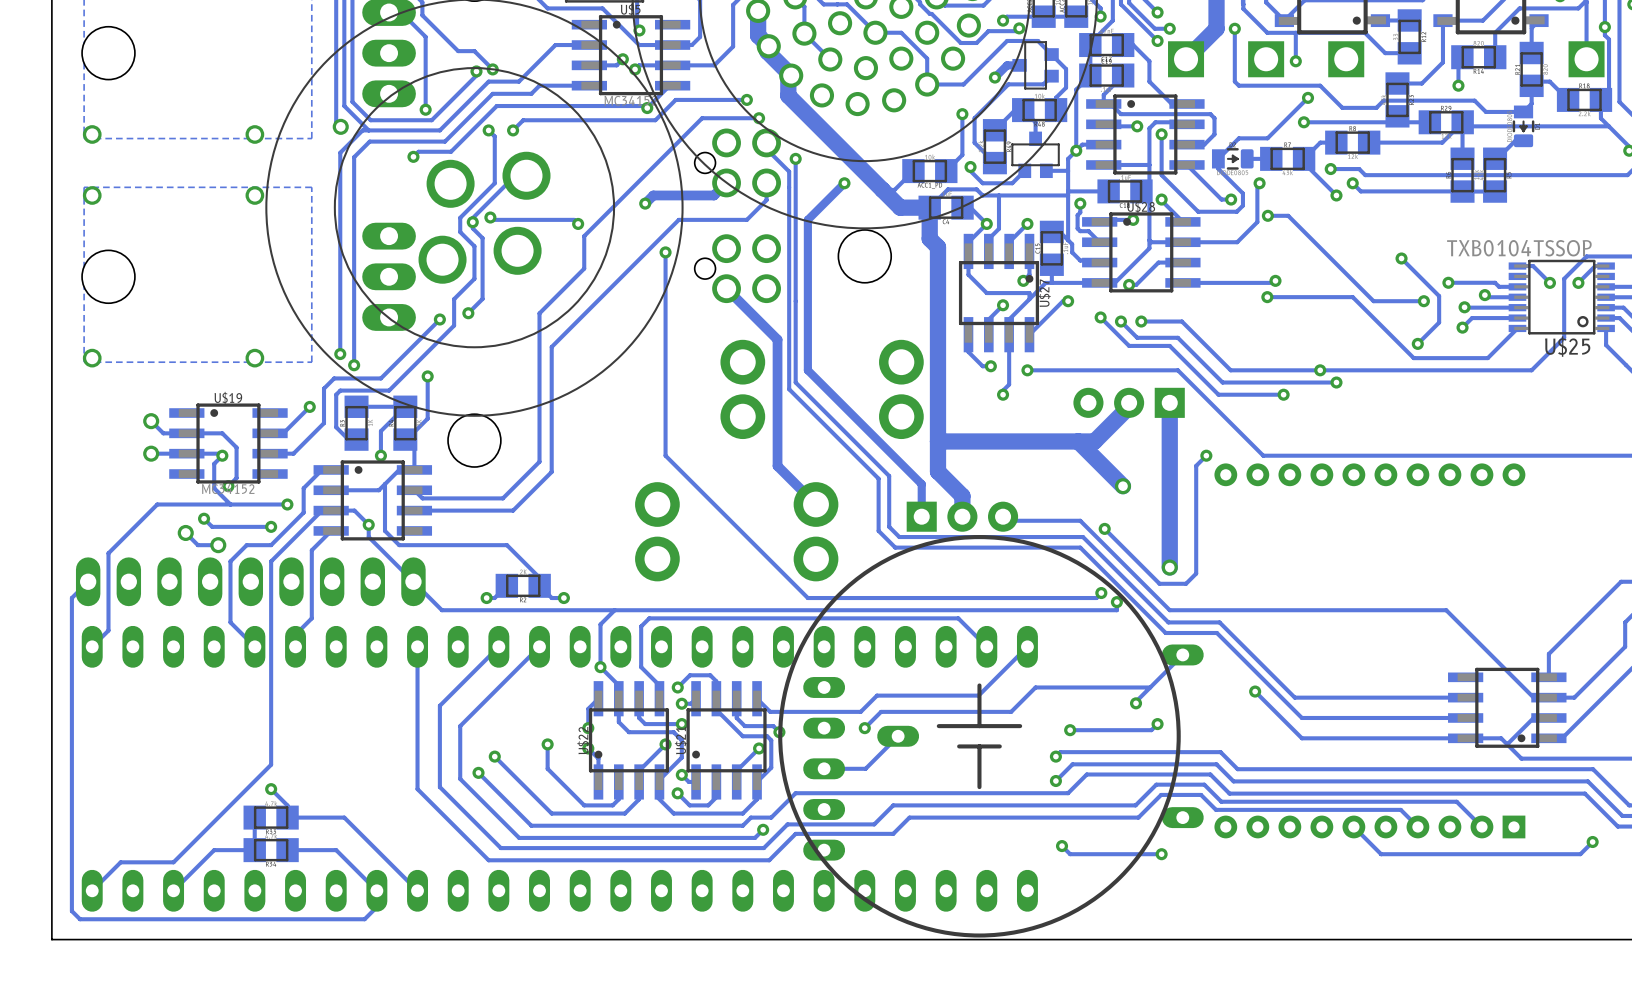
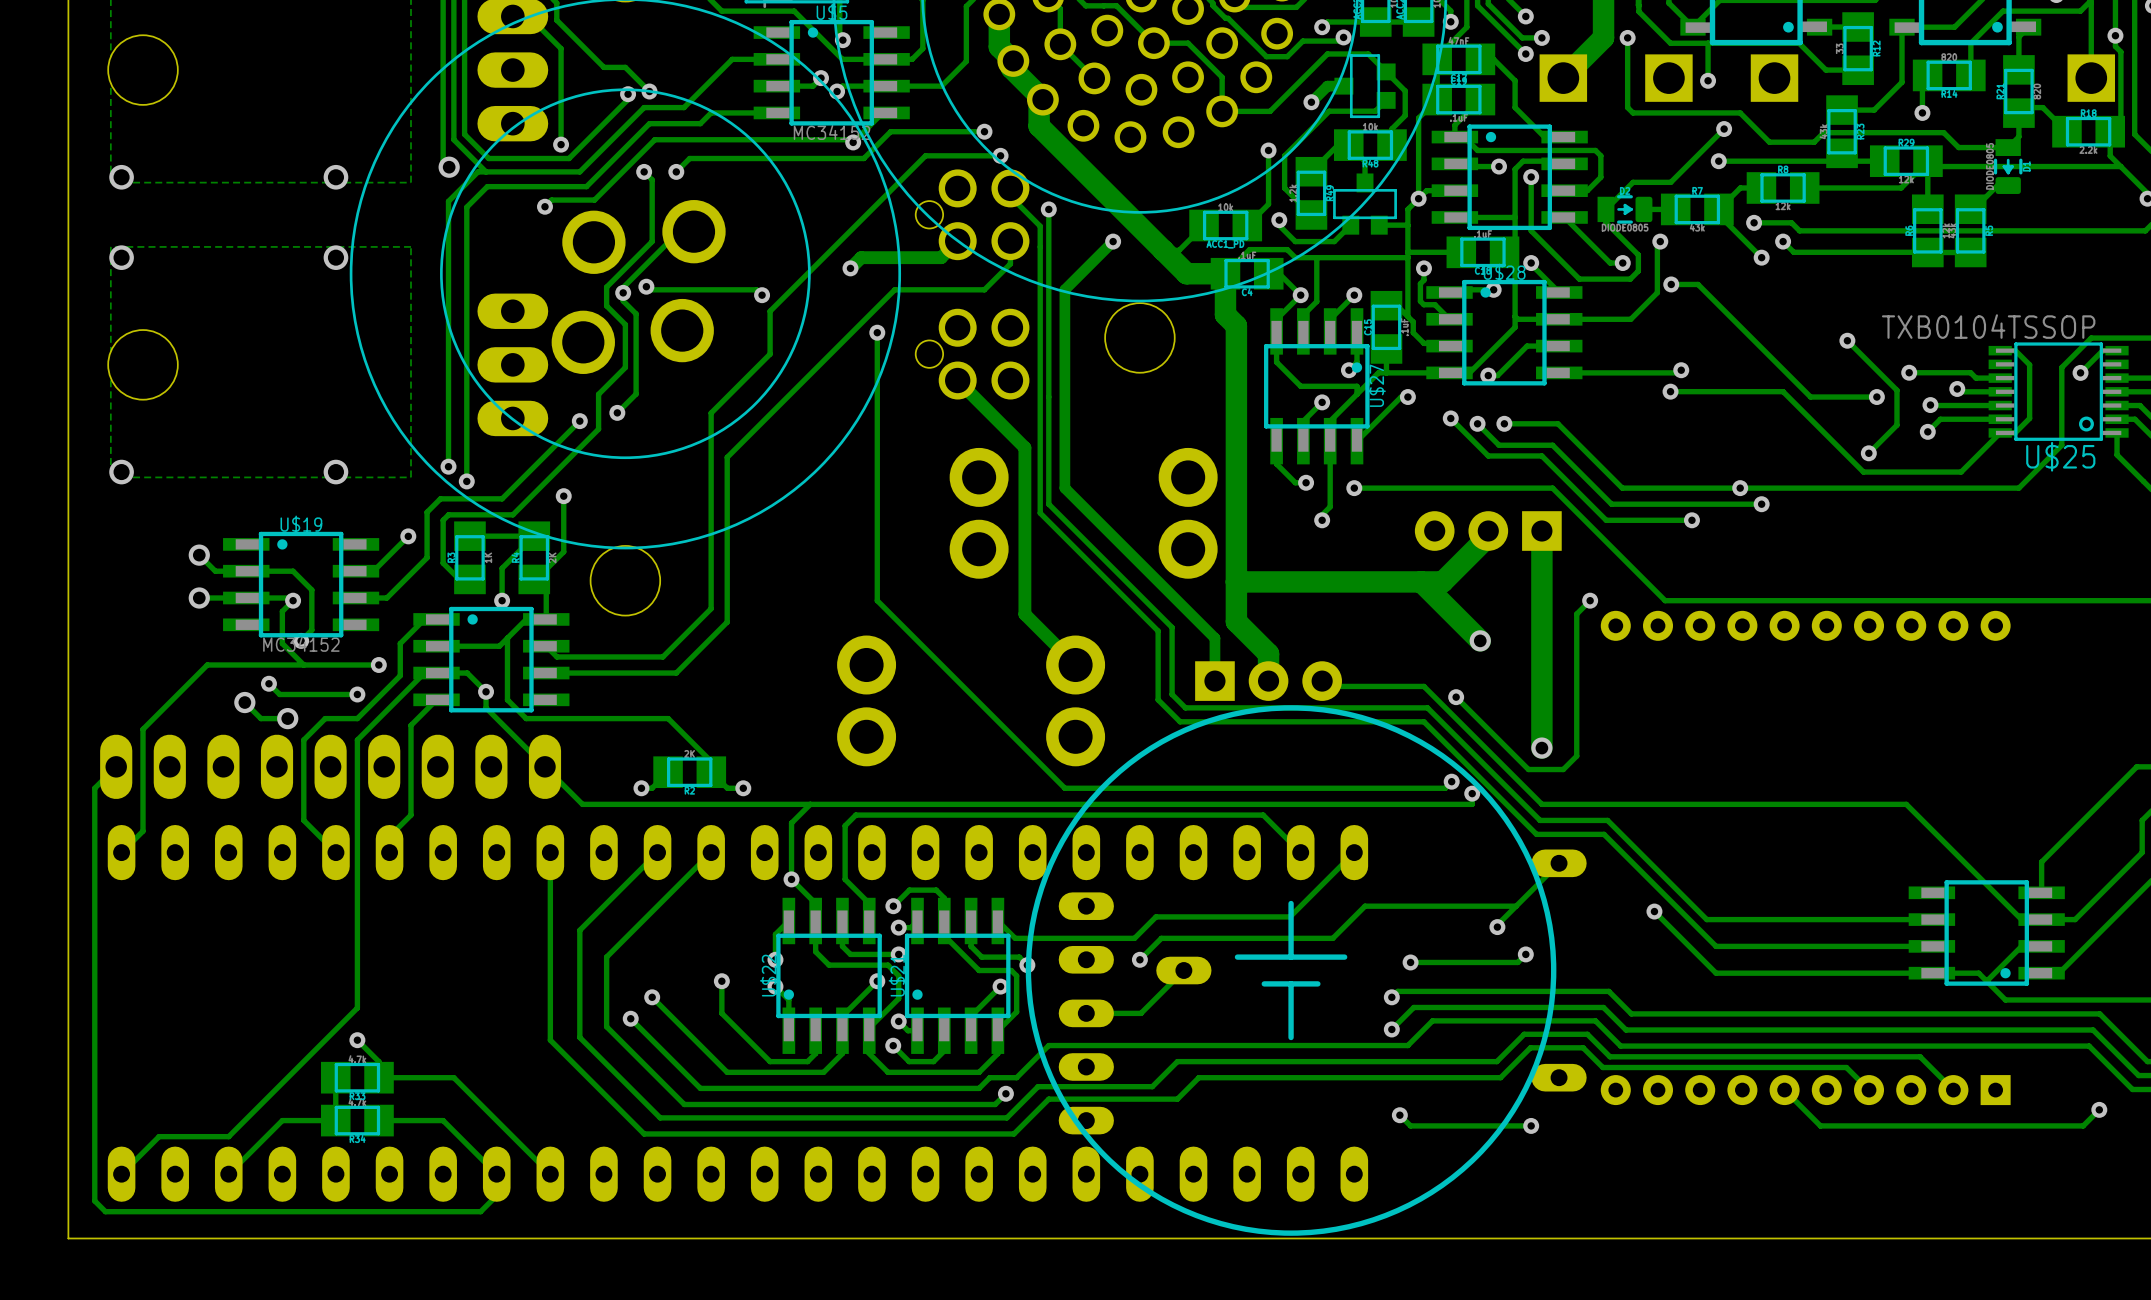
track: (1529, 266) (1533, 266) (1549, 282) -> (2015, 350) (2029, 364) (2029, 418) (2015, 432) (2000, 432)
via: (1549, 282) -> none

